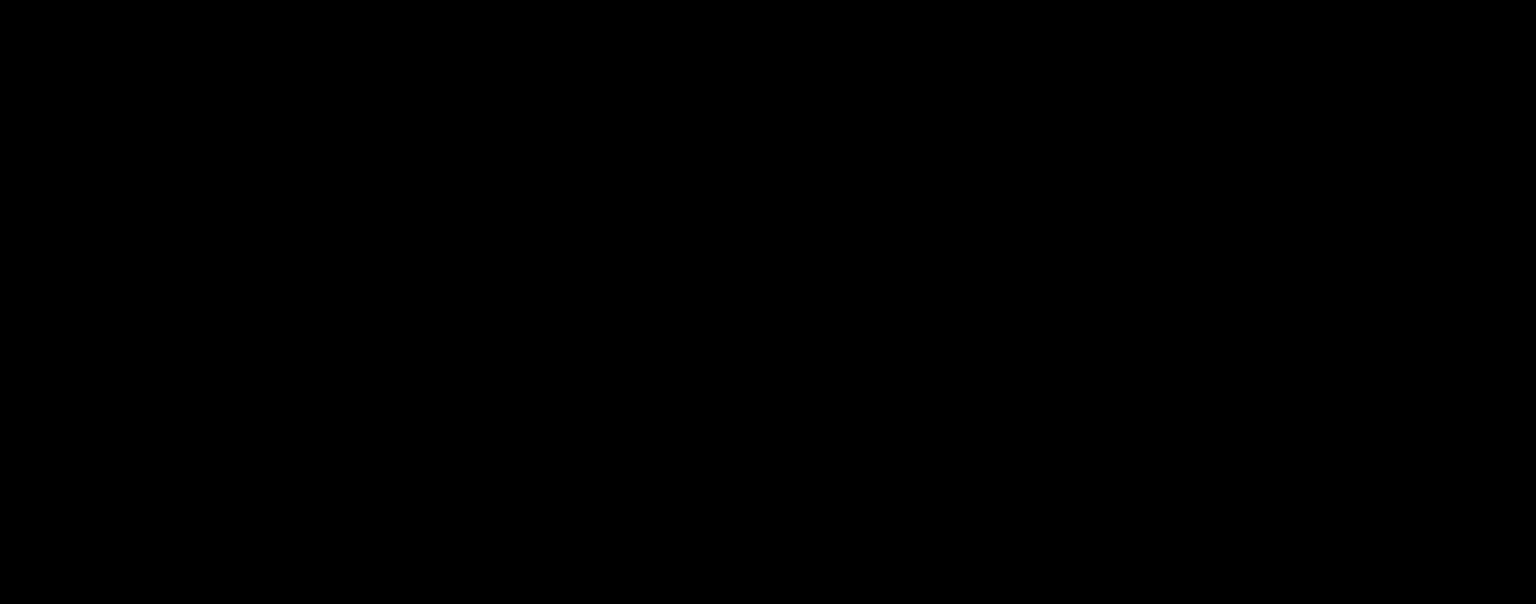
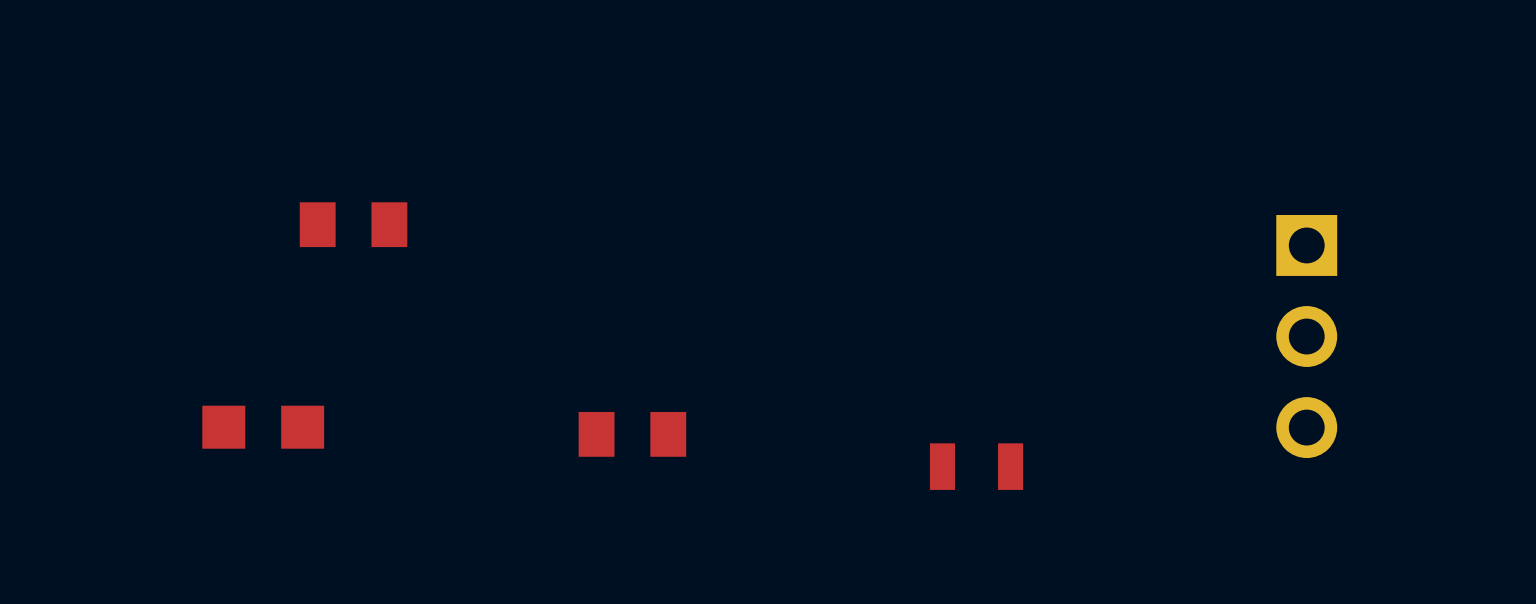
part: none -> (353, 224)
part: none -> (1306, 336)
part: none -> (263, 427)
part: none -> (632, 434)
part: none -> (976, 466)

